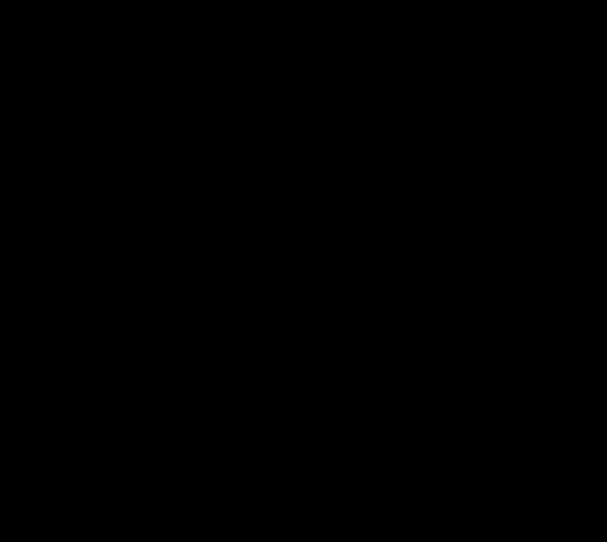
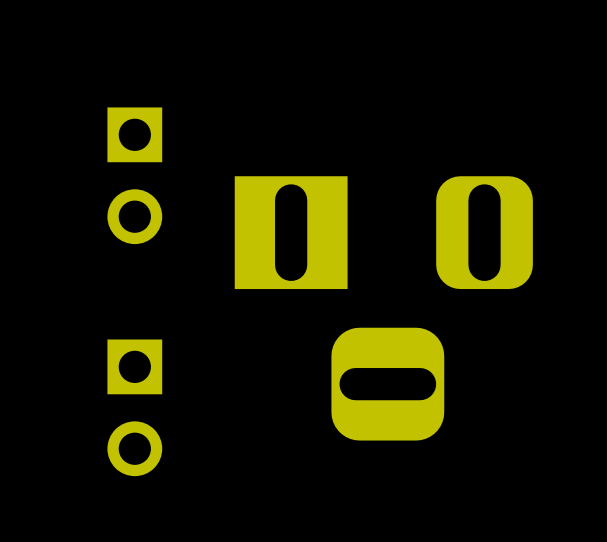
part: none -> (134, 175)
part: none -> (383, 308)
part: none -> (134, 407)

